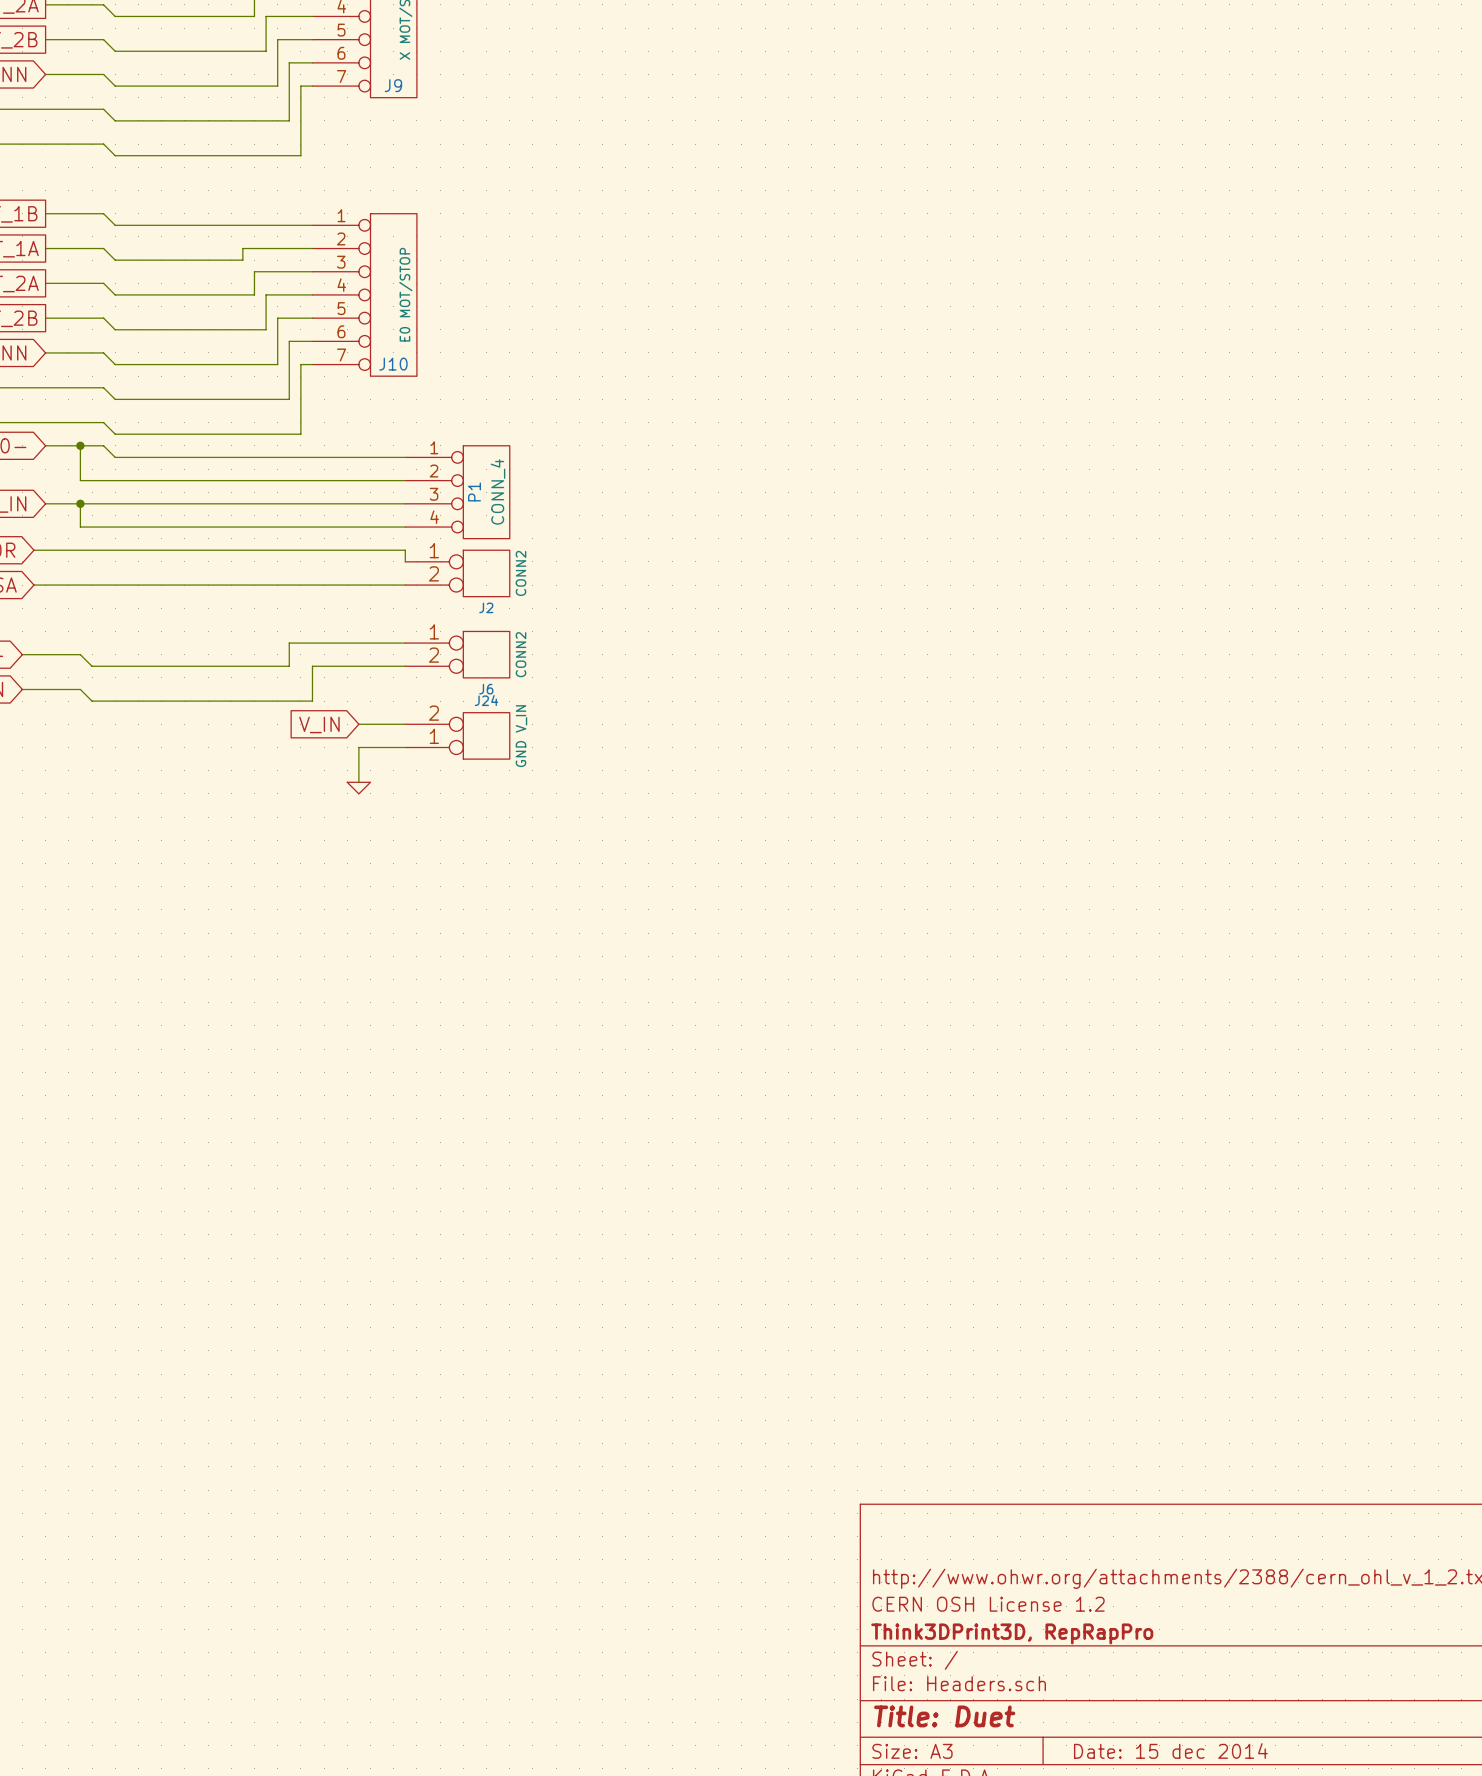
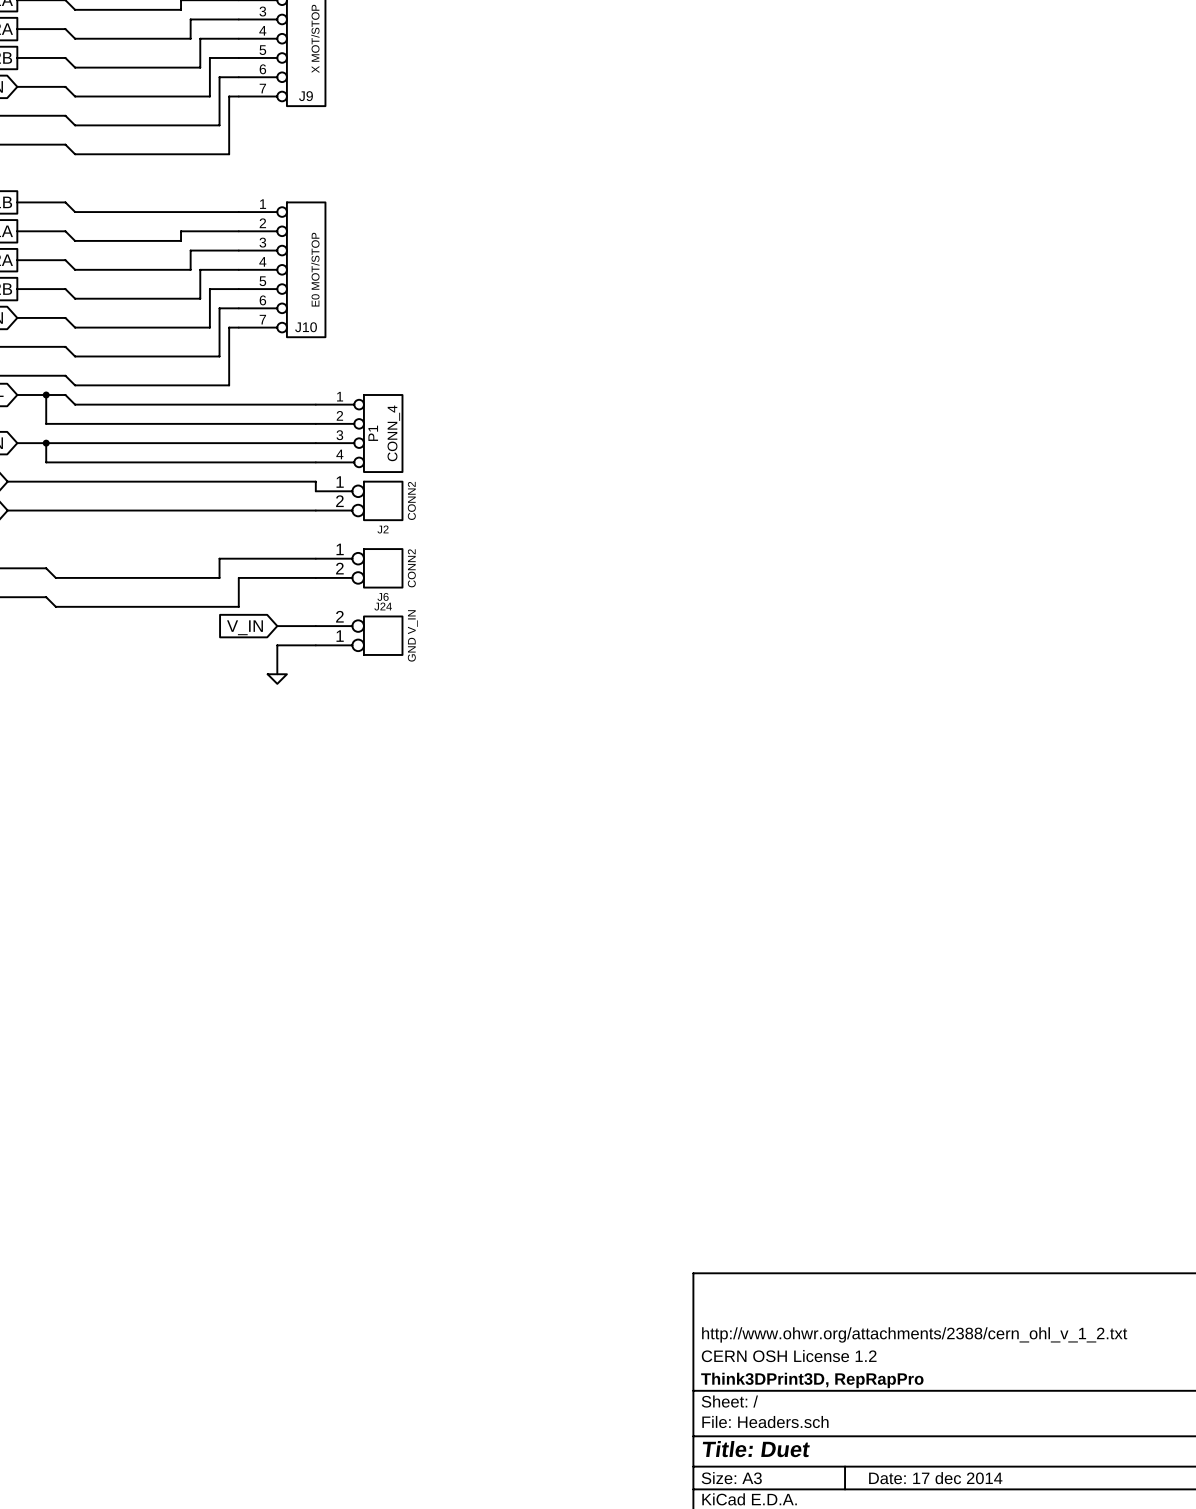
title block: Date: 15 dec 2014 (1170, 1751) -> Date: 17 dec 2014 (935, 1478)

